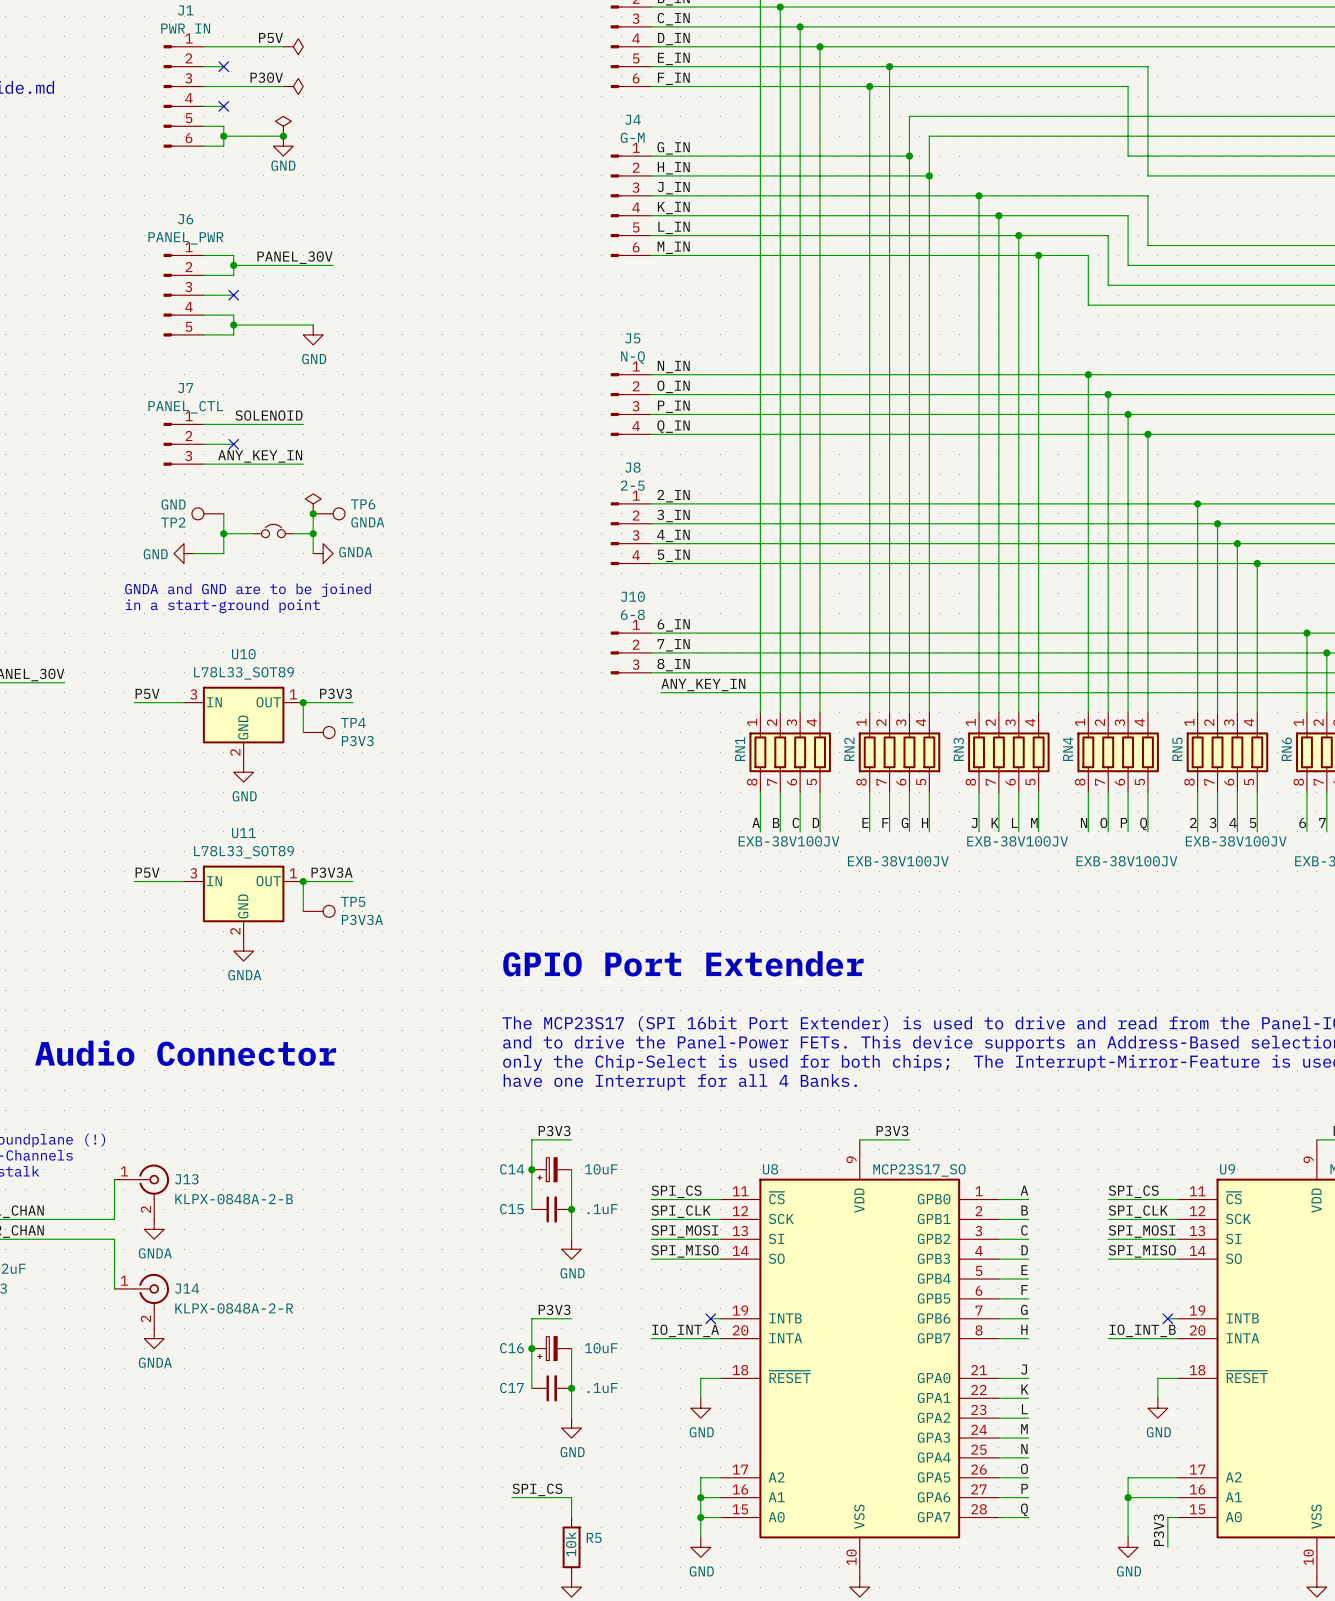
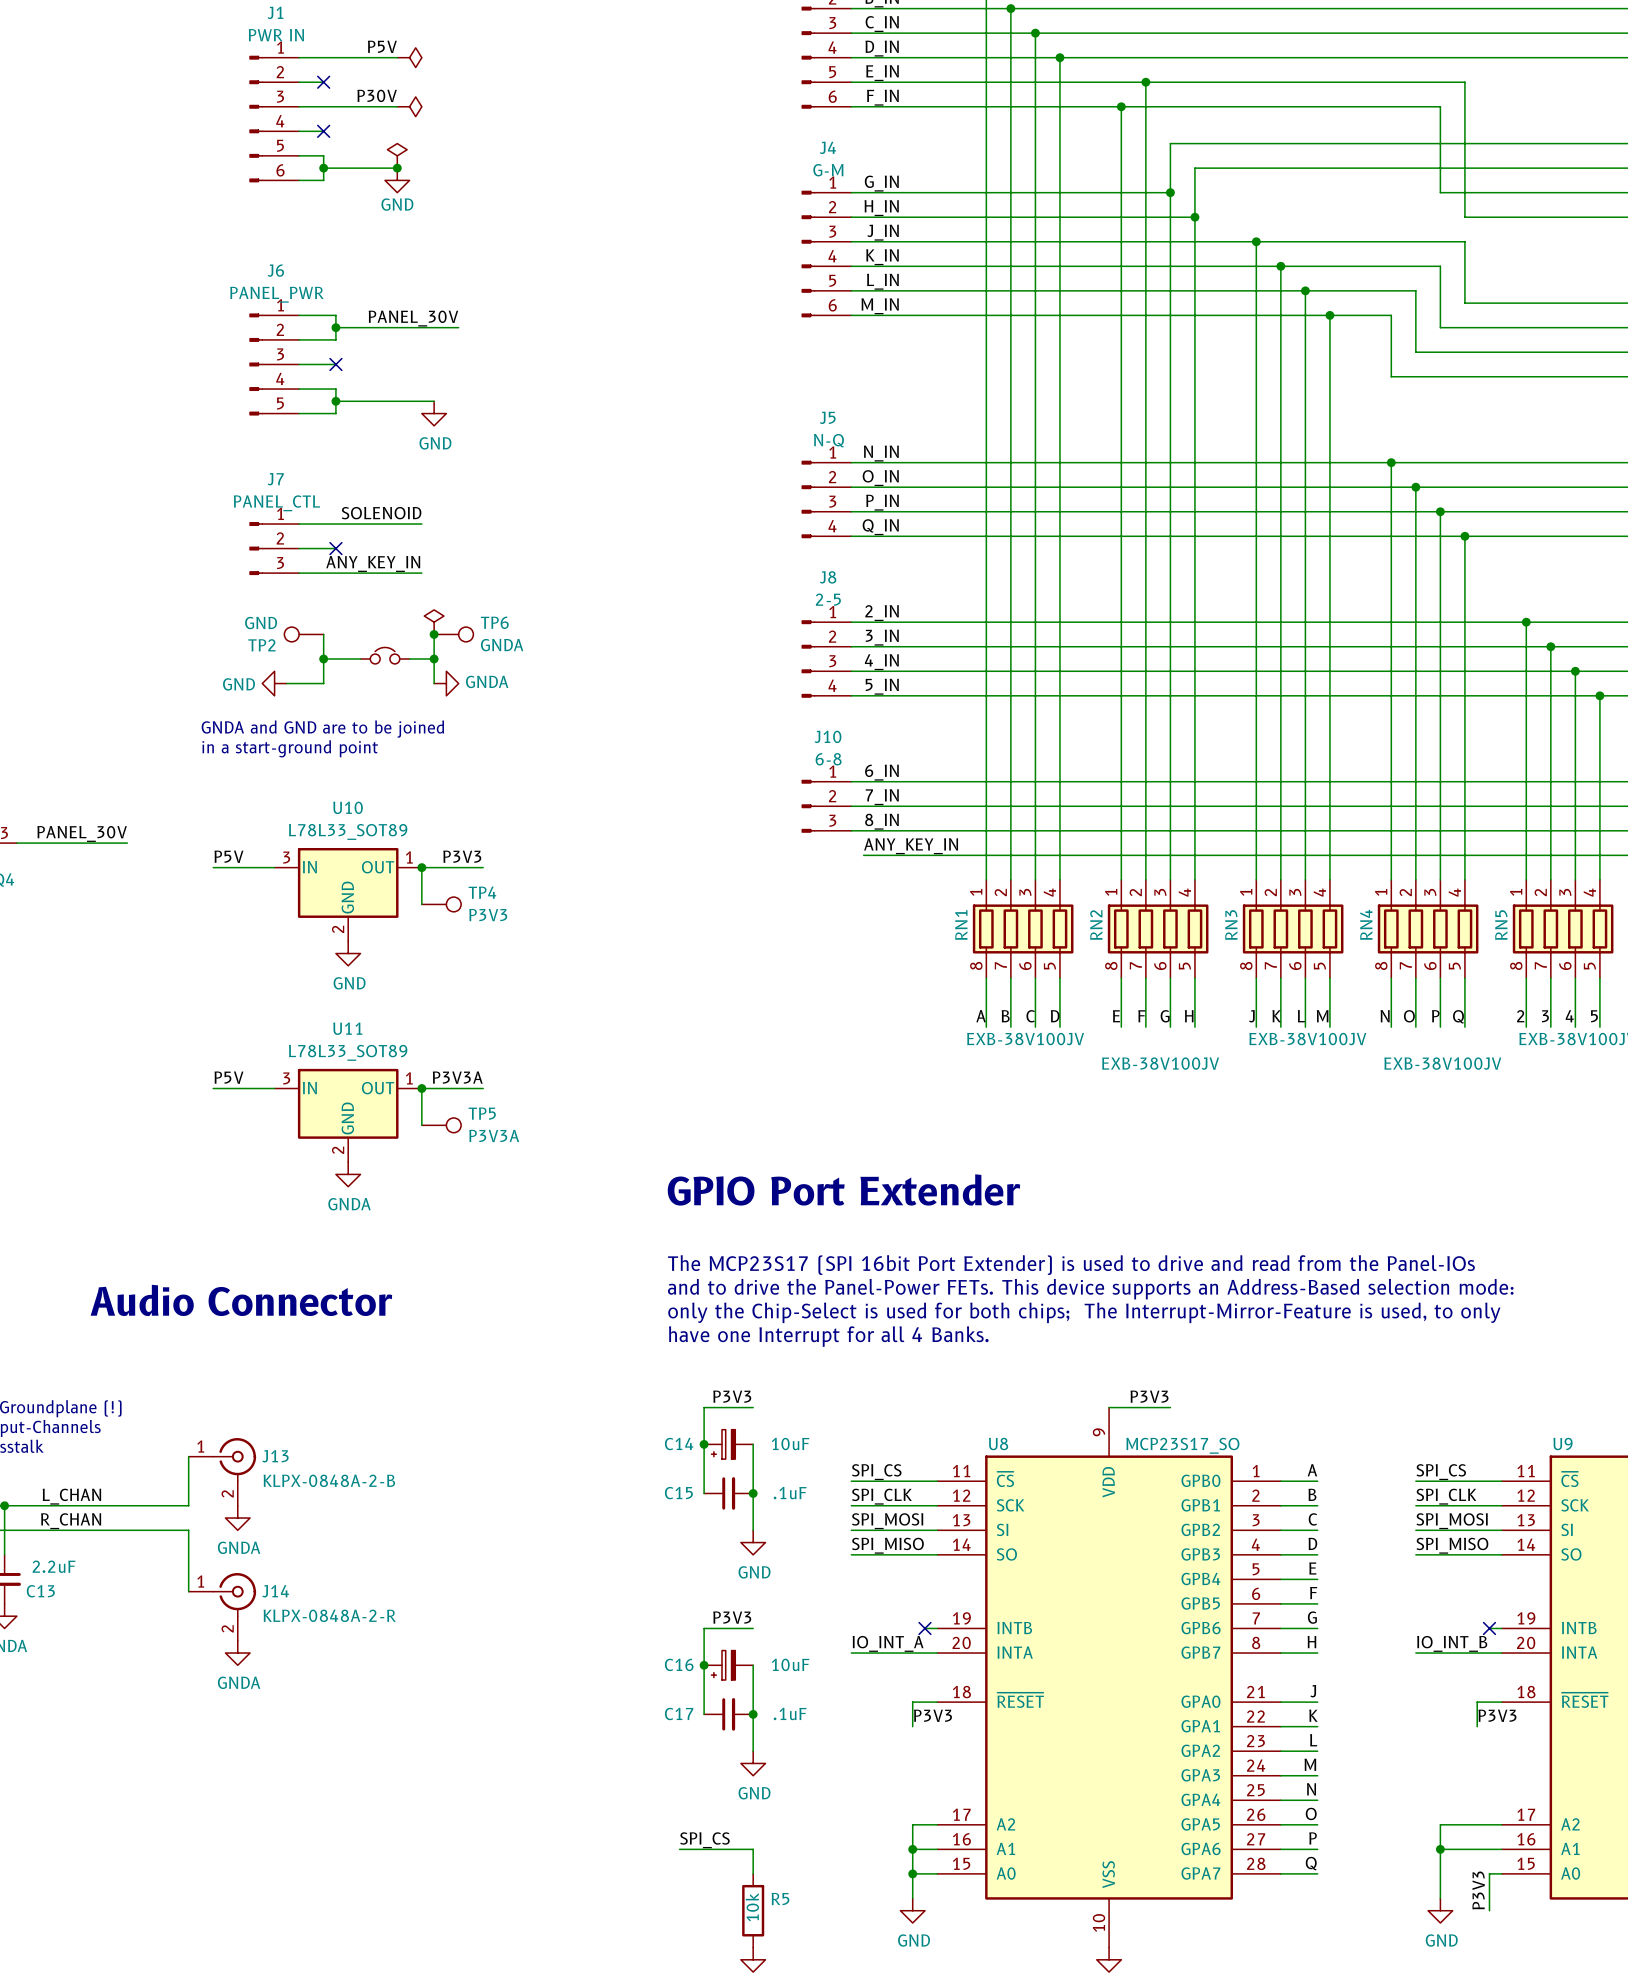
label: none -> P3V3 (932, 1715)
label: none -> P3V3 (1497, 1715)
power symbol: GND (700, 1408) -> none
power symbol: GND (1157, 1408) -> none

